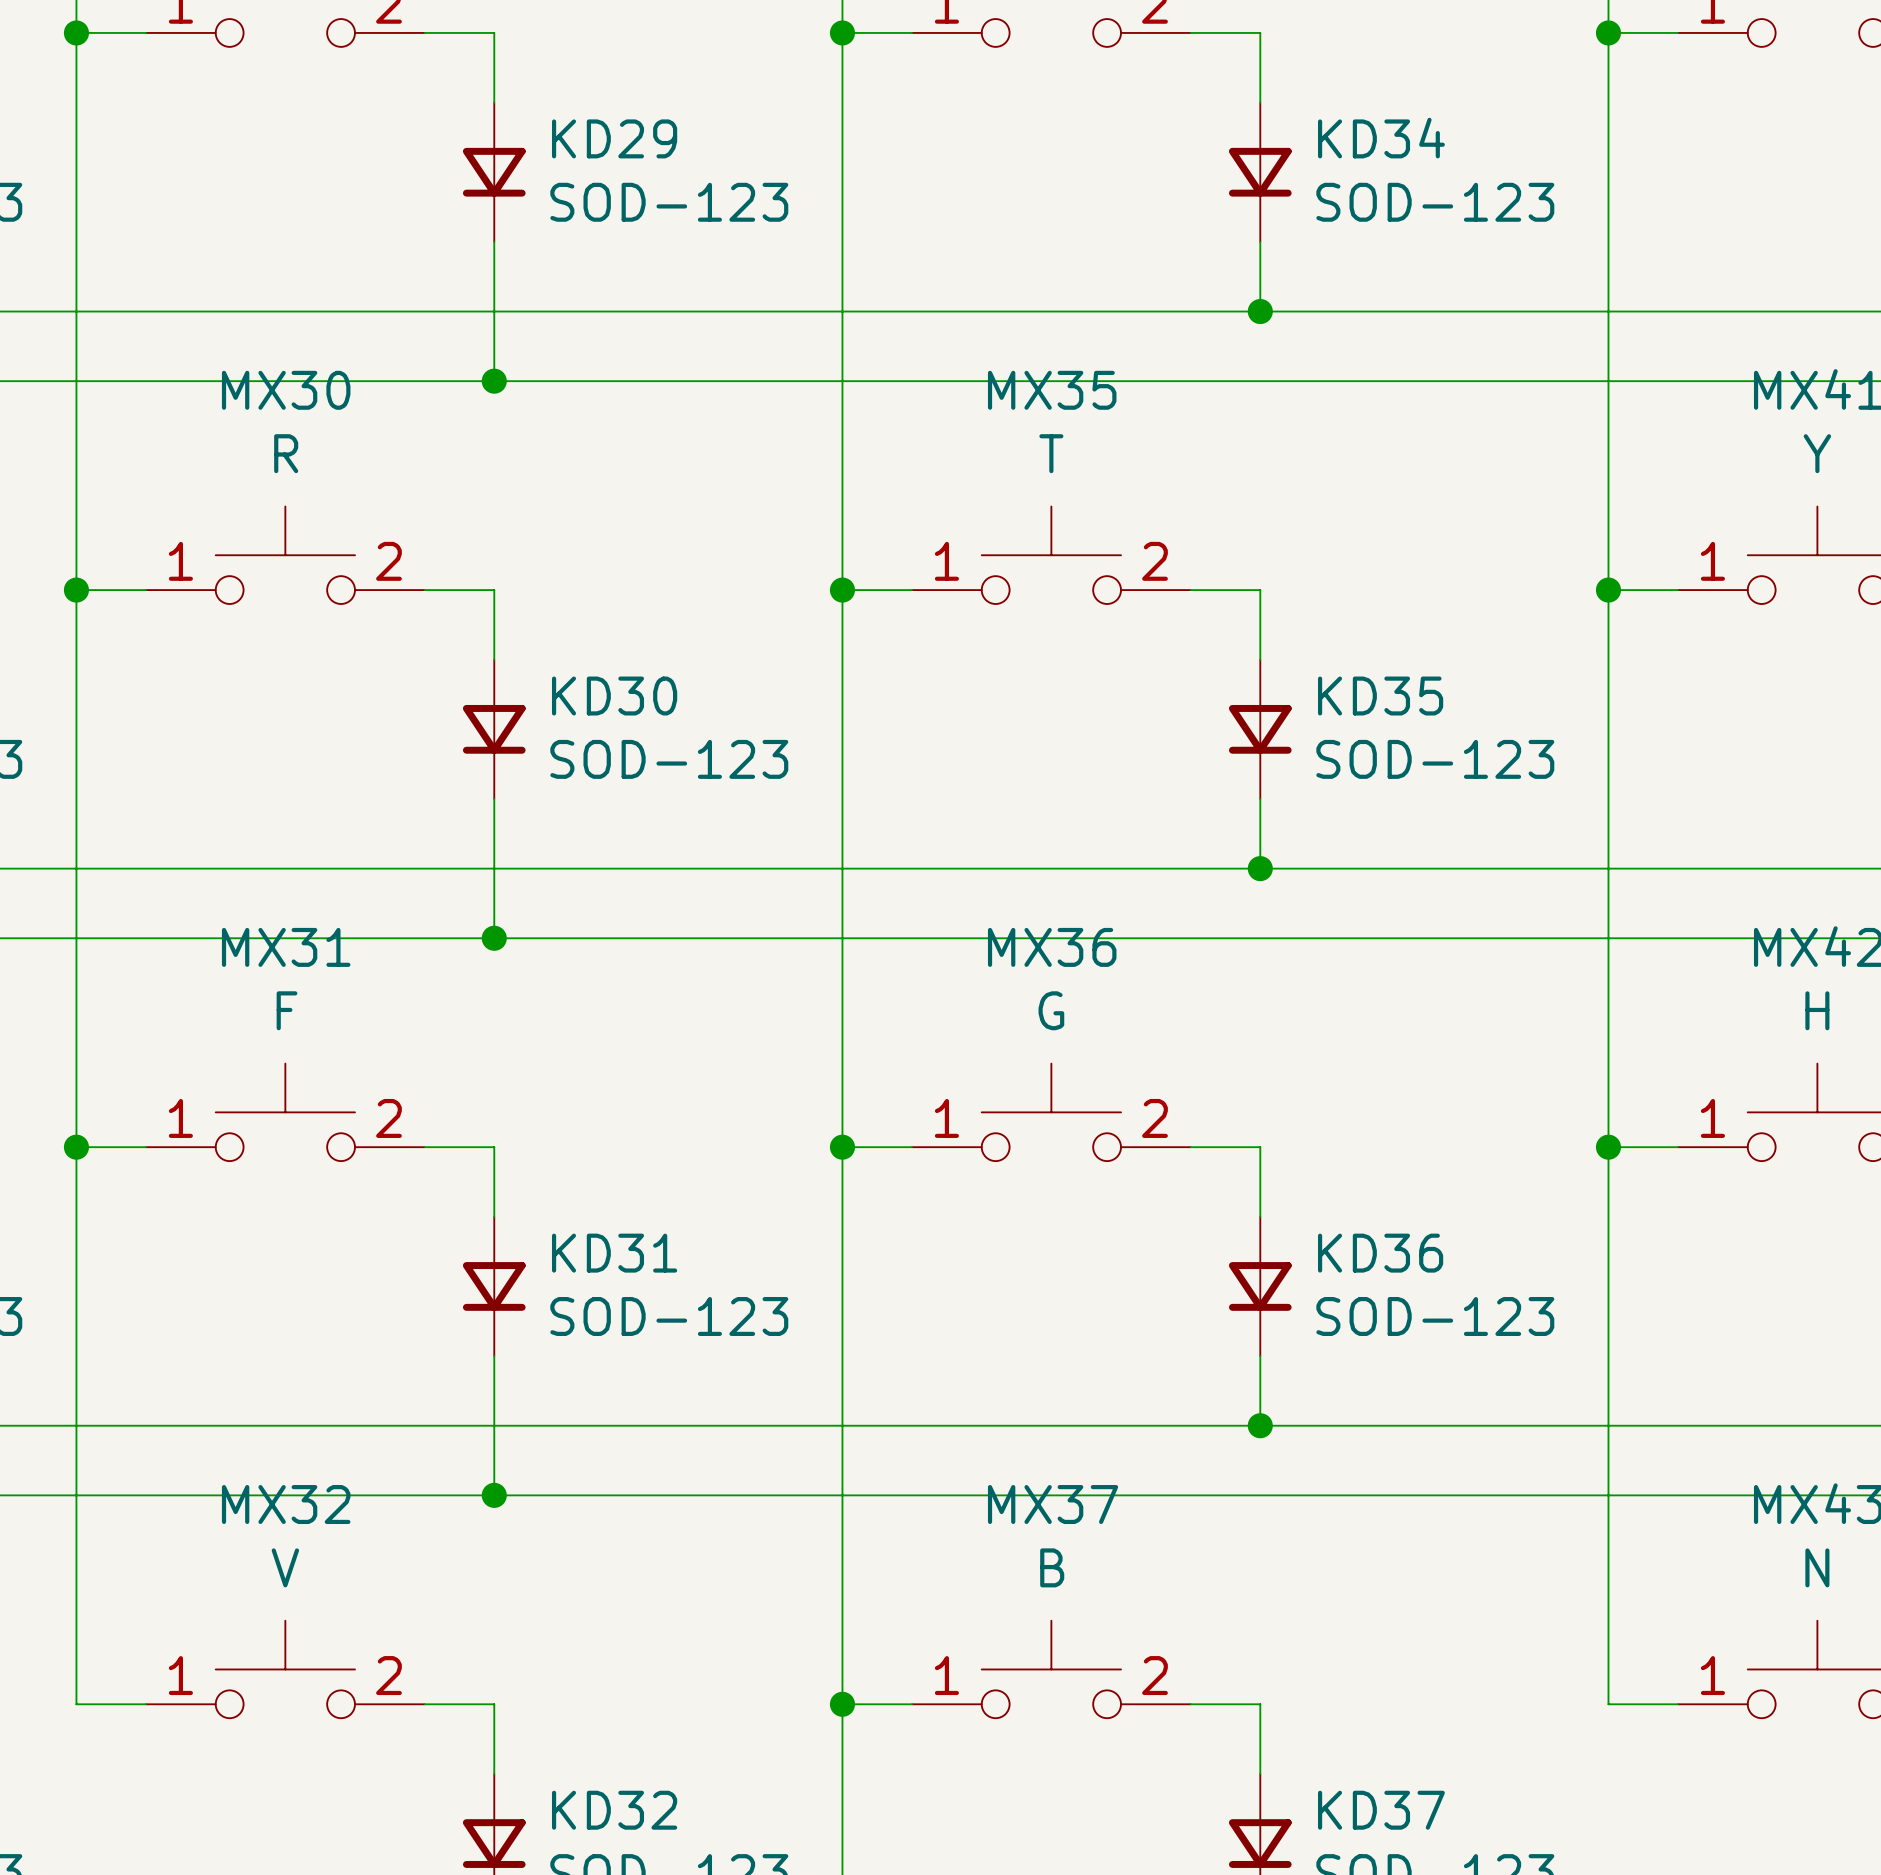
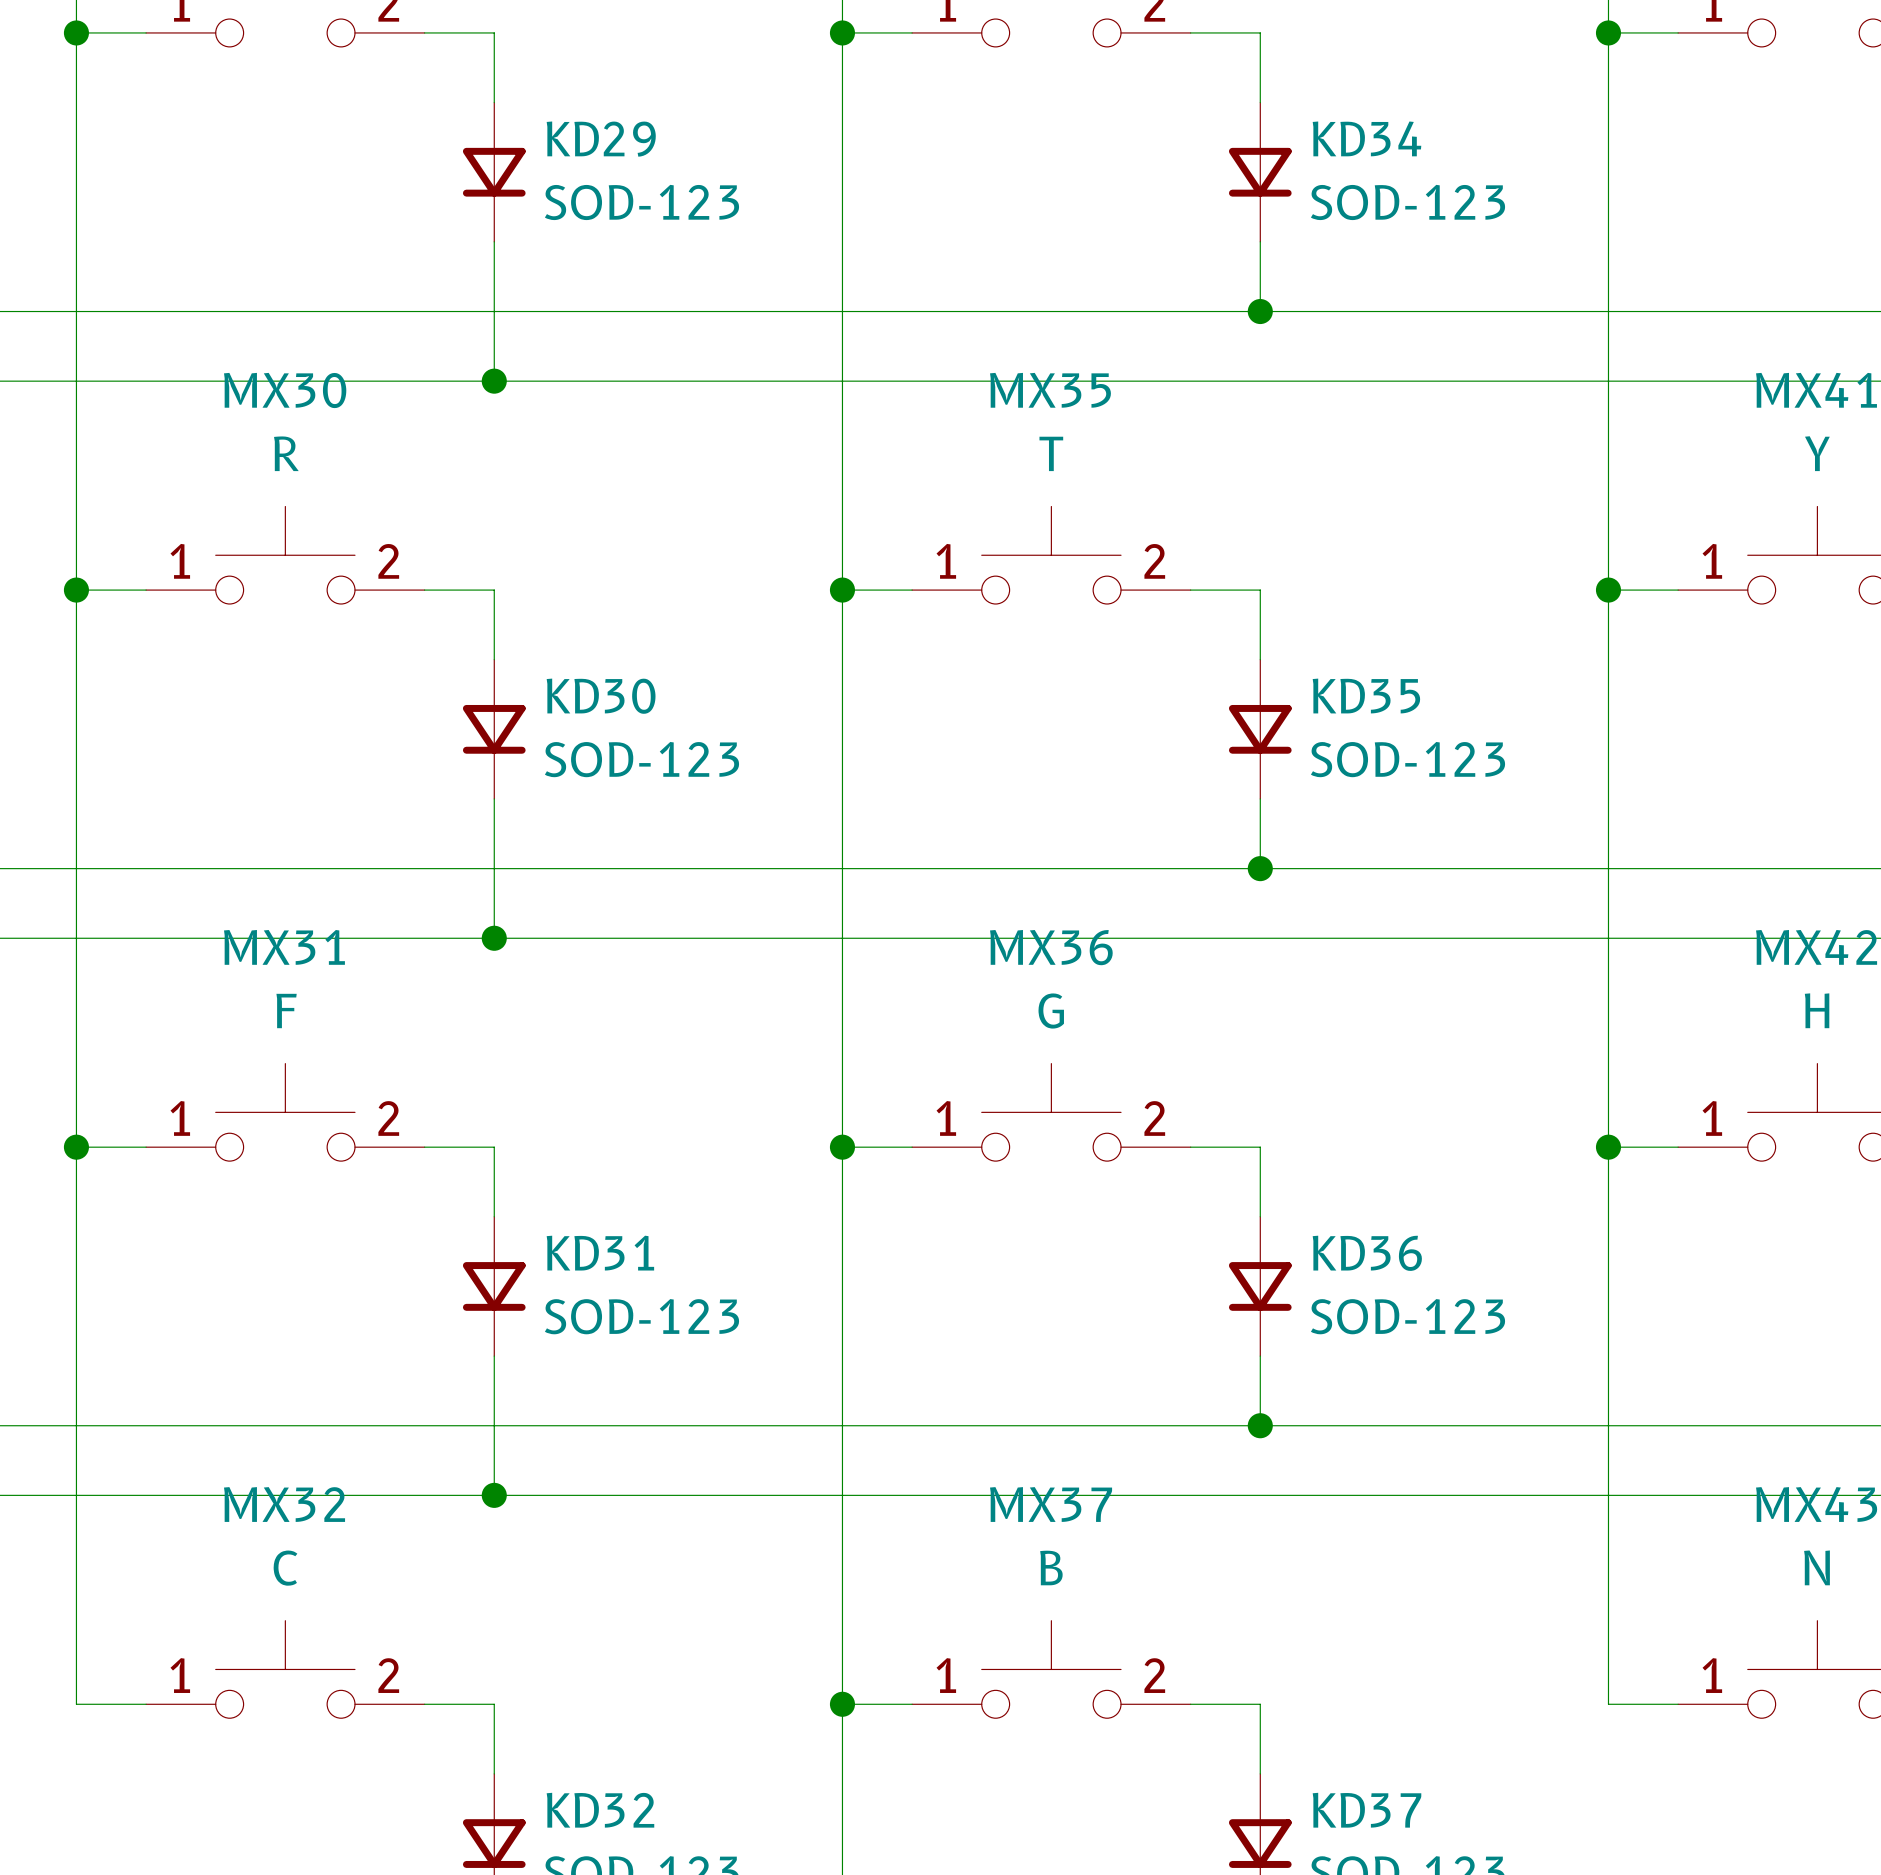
MX32 value: V (285, 1567) -> C (285, 1568)

